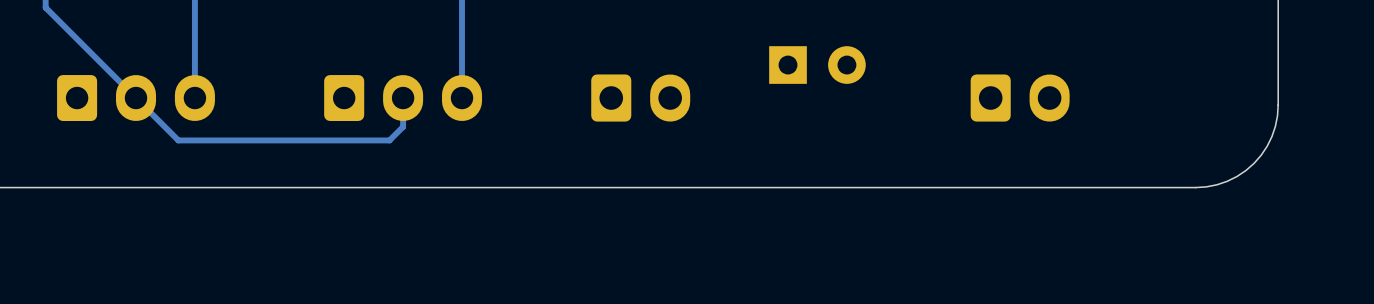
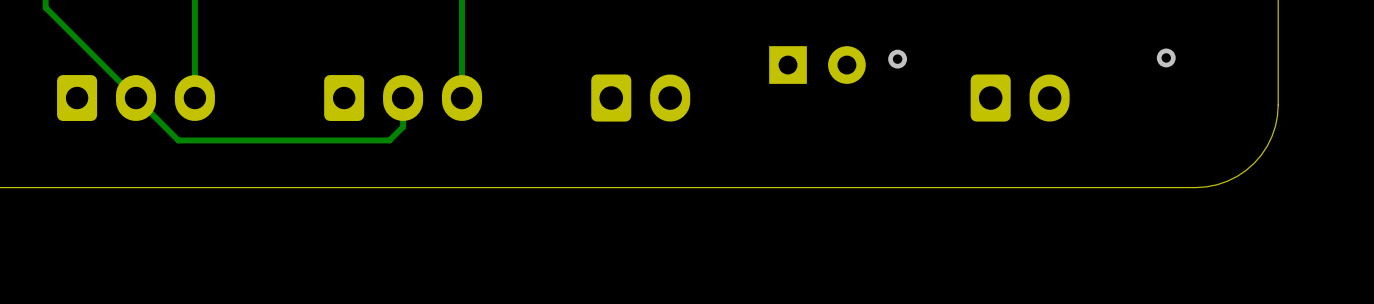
via: none -> (1166, 57)
via: none -> (897, 59)

